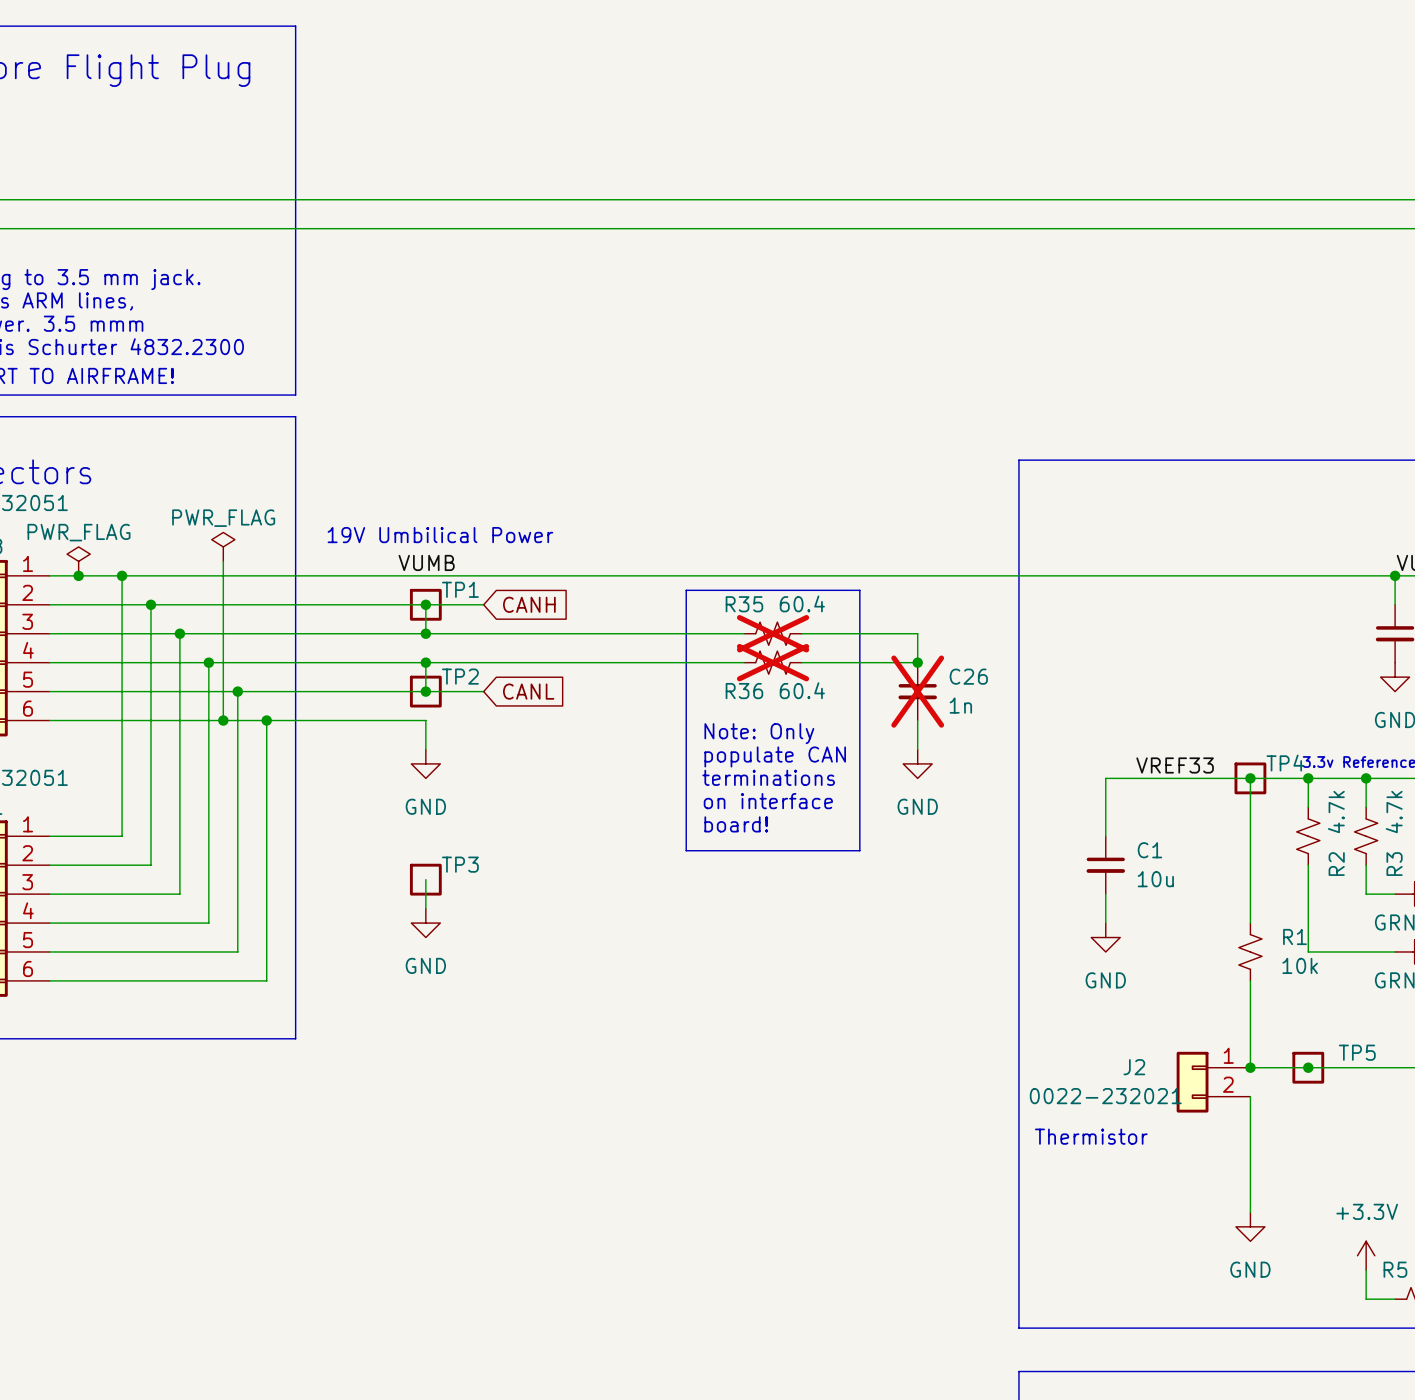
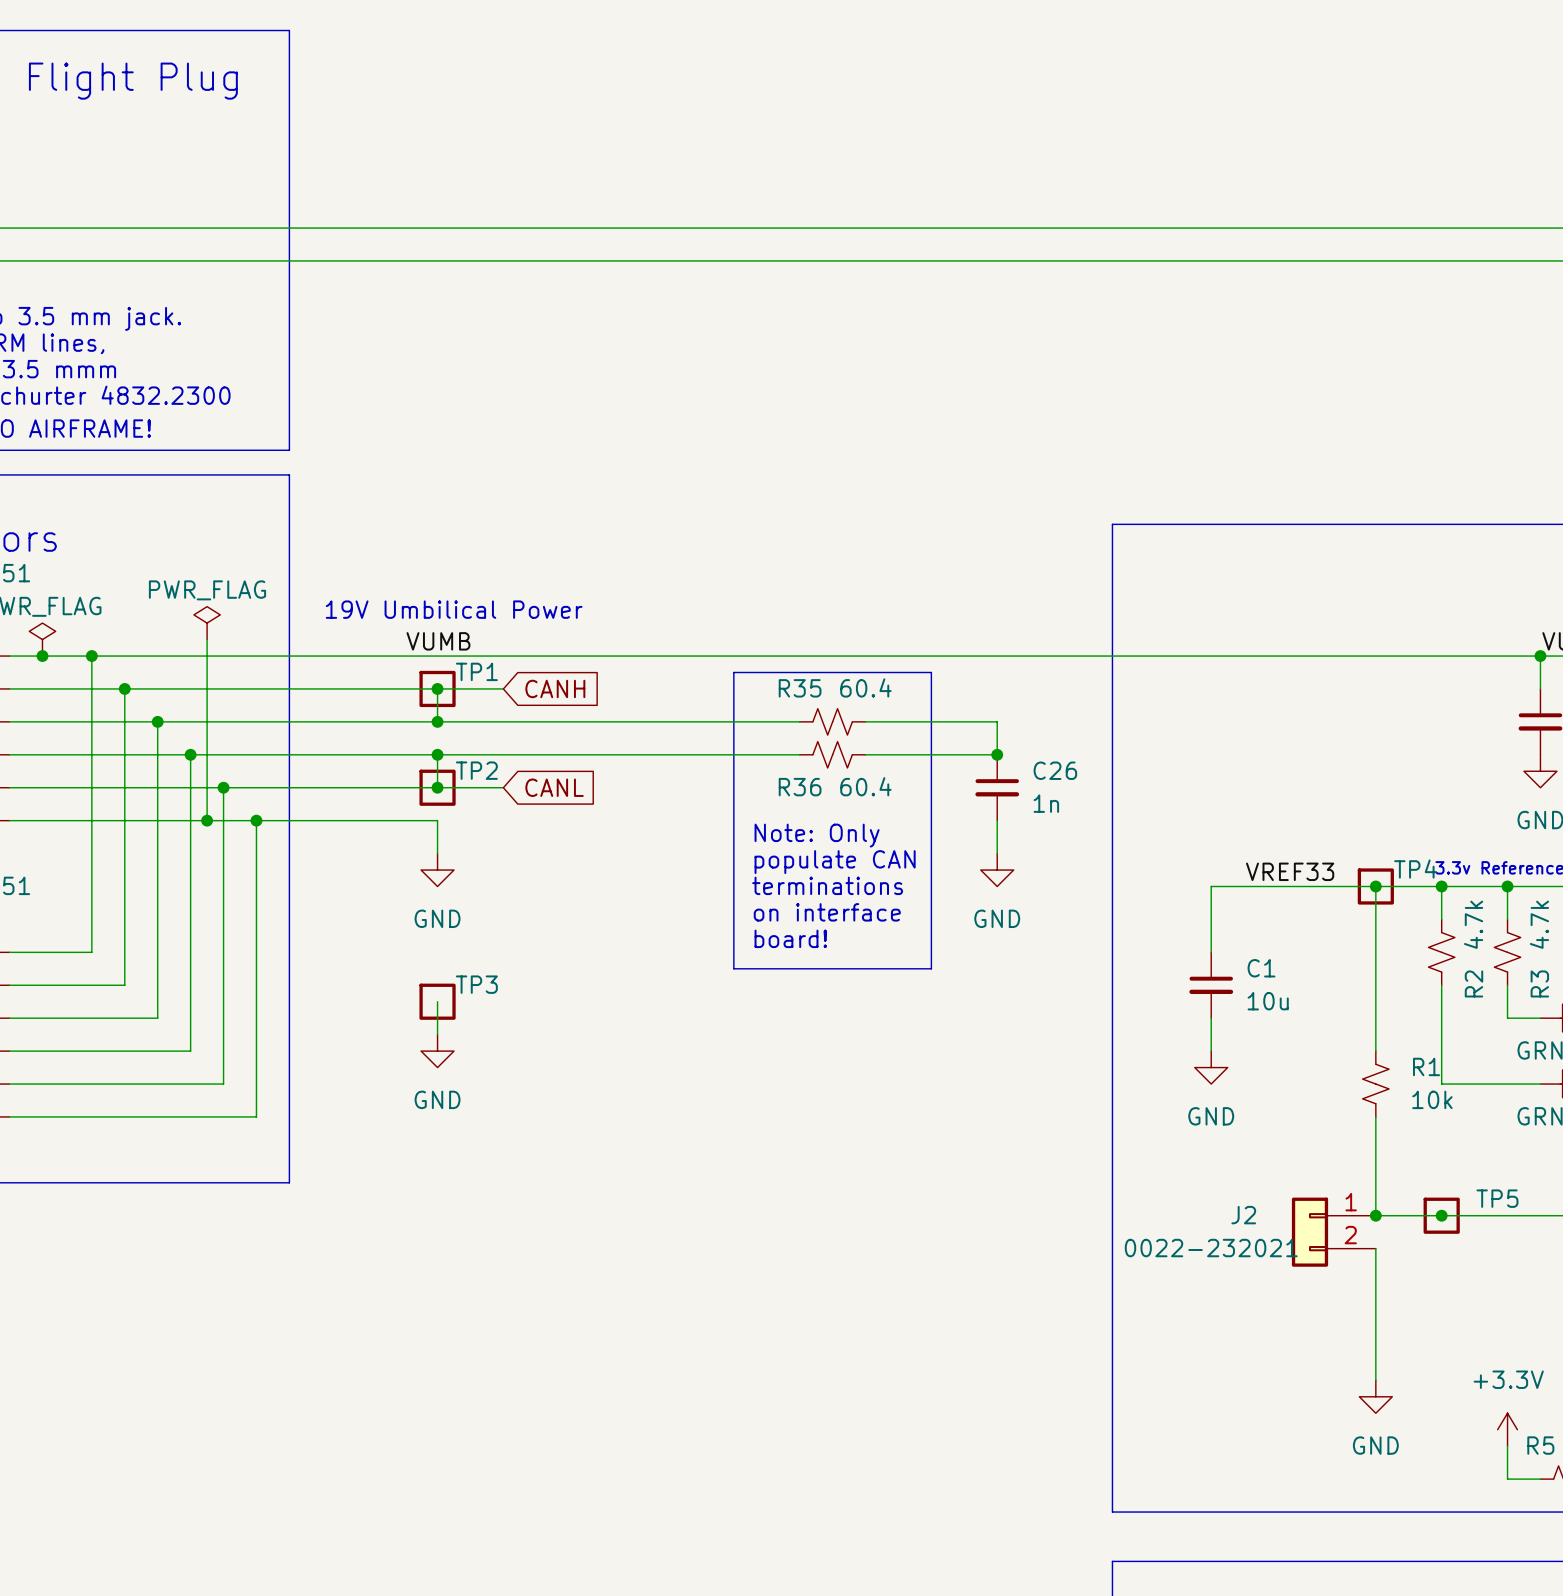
R35 do-not-place cross: (773, 633) -> none
R36 do-not-place cross: (773, 662) -> none
C26 do-not-place cross: (917, 691) -> none
text: Thermistor (1091, 1136) -> none

